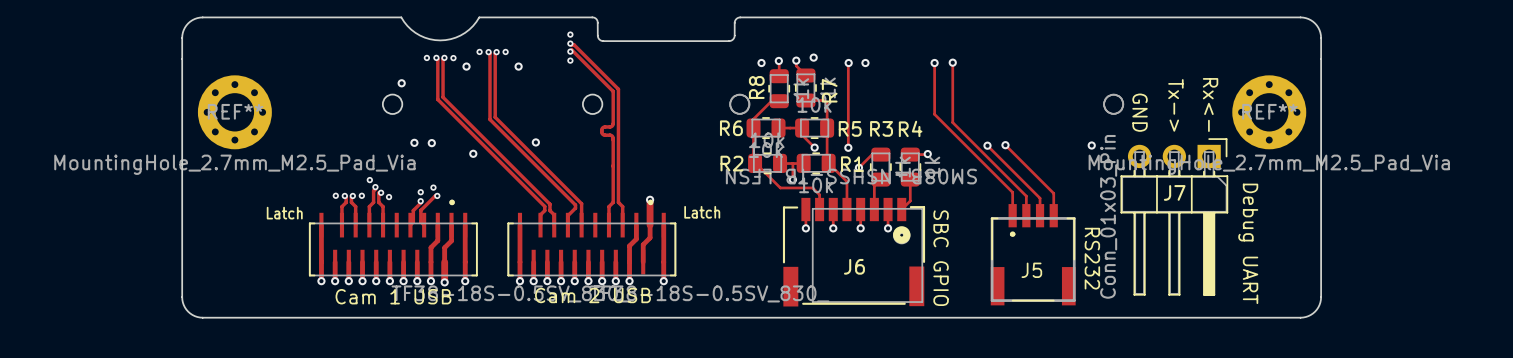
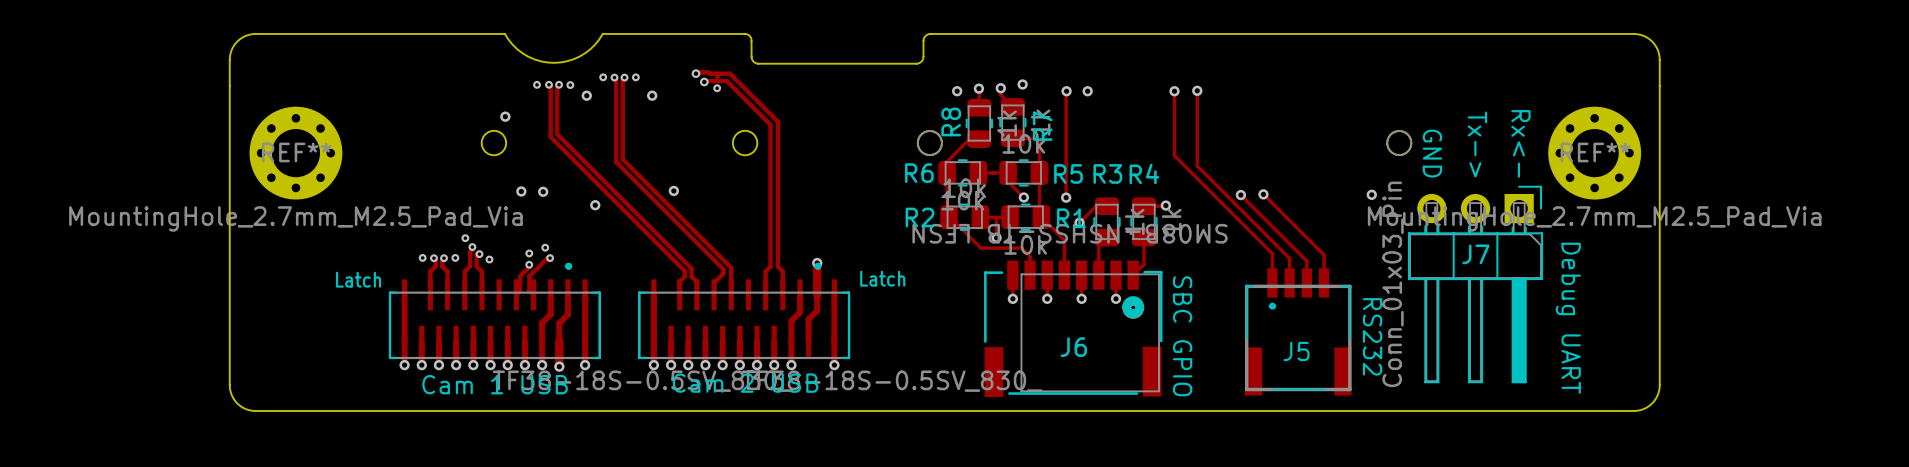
via: (570, 34) -> none
track: (570, 43) (574, 45) (618, 89) (618, 202) -> (695, 73) (729, 73) (777, 121) (777, 266)
via: (570, 43) -> none
via: none -> (695, 73)
track: (572, 50) (613, 91) (613, 124) (610, 126) (603, 127) (601, 130) (603, 134) (611, 135) (613, 138) (612, 202) -> (704, 81) (726, 81) (770, 124) (770, 266)
via: (570, 51) -> none
via: none -> (704, 81)

